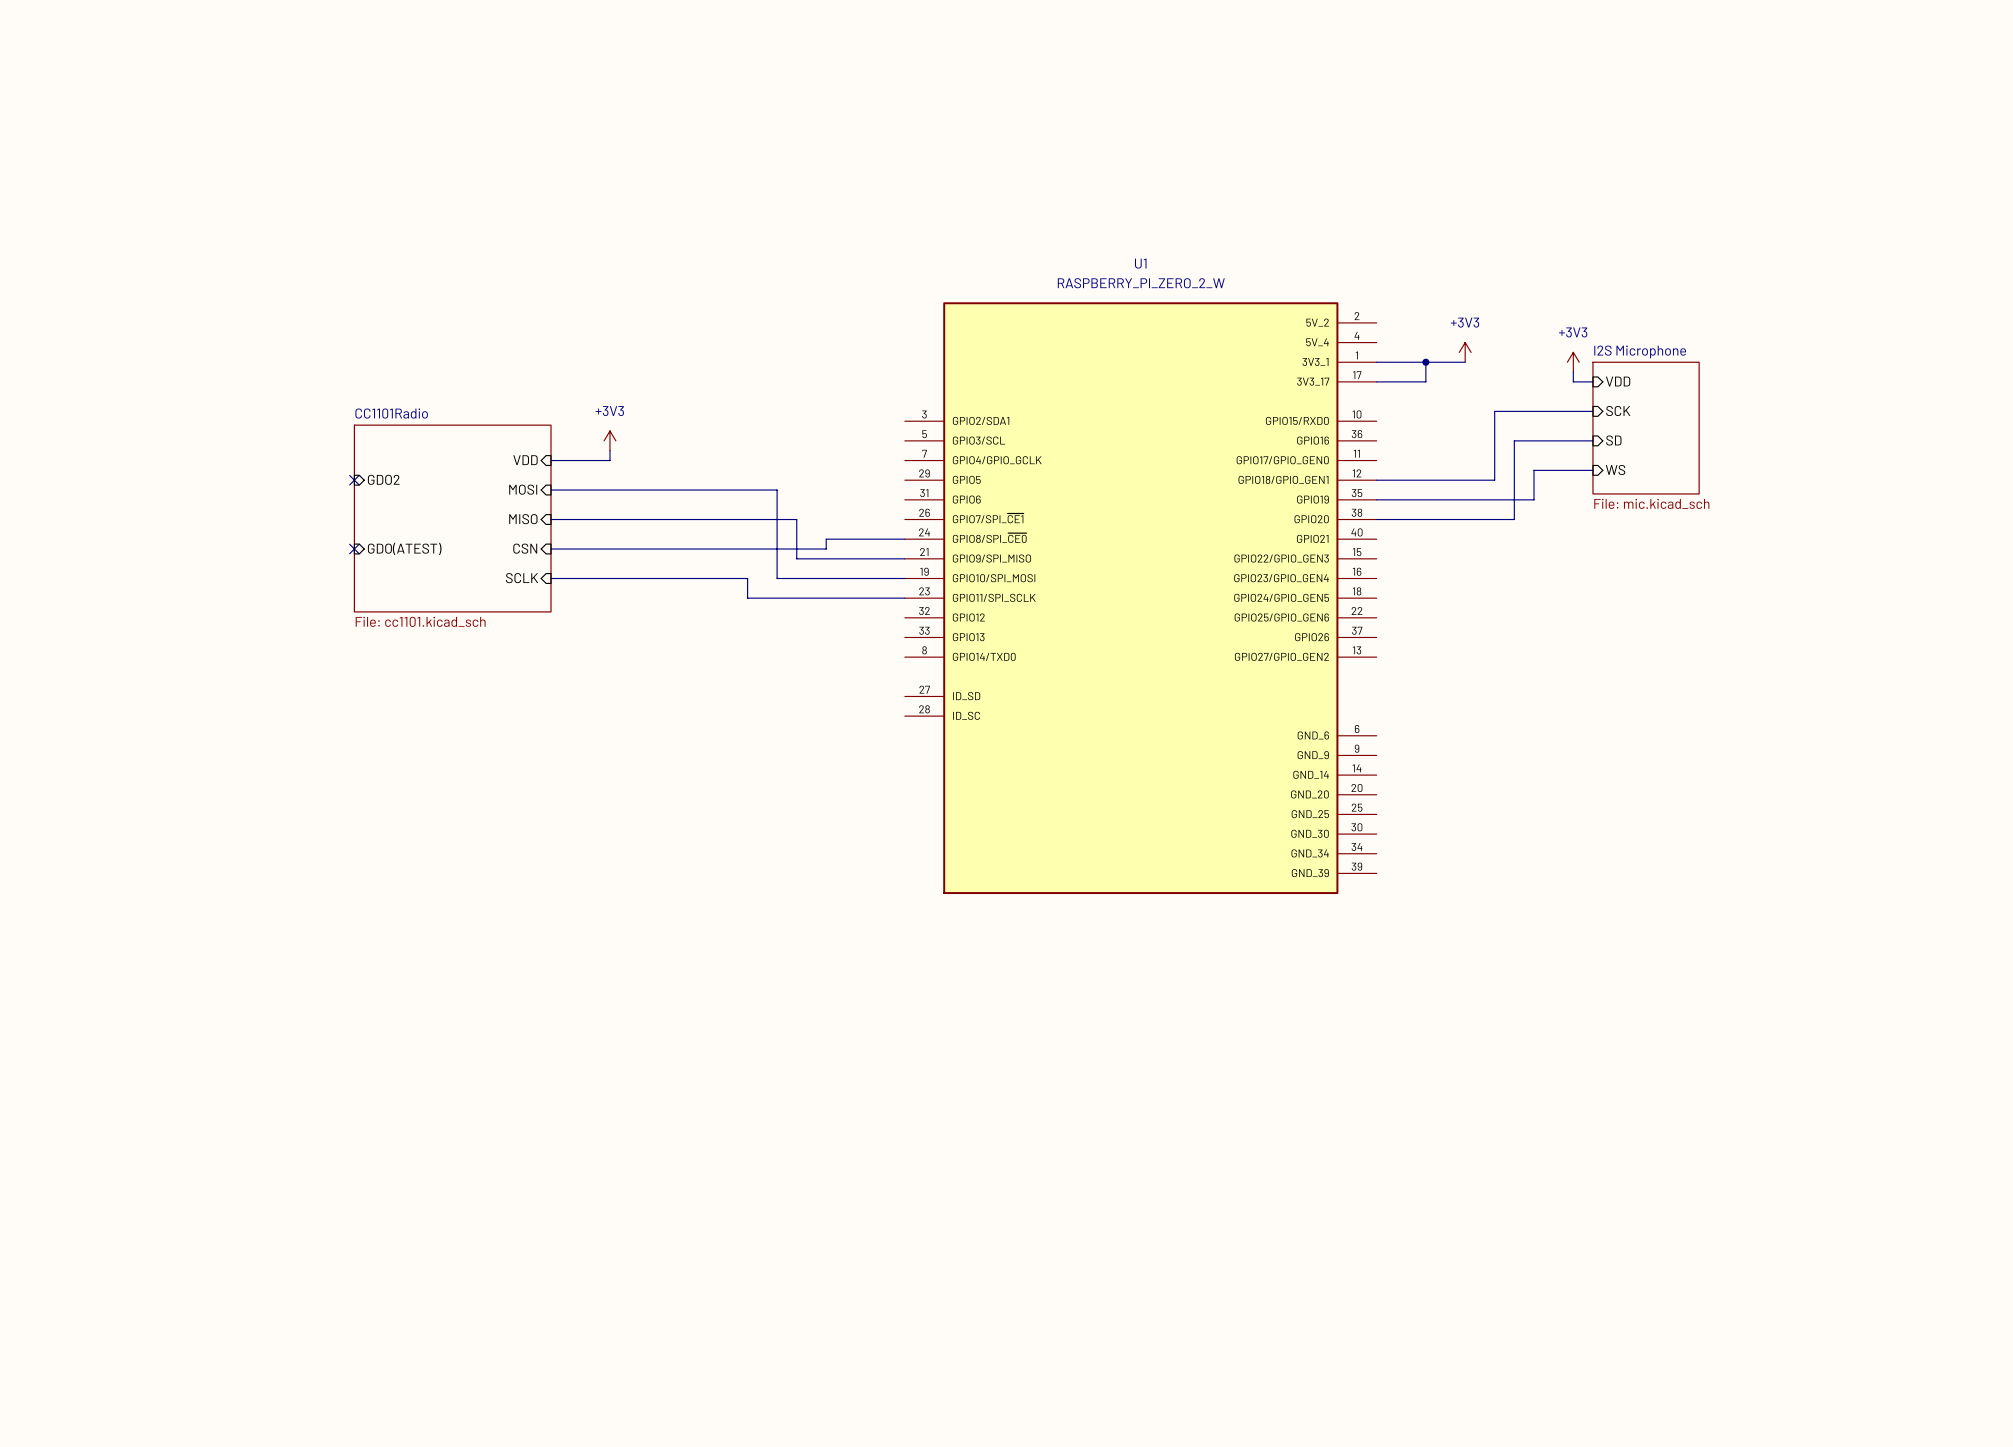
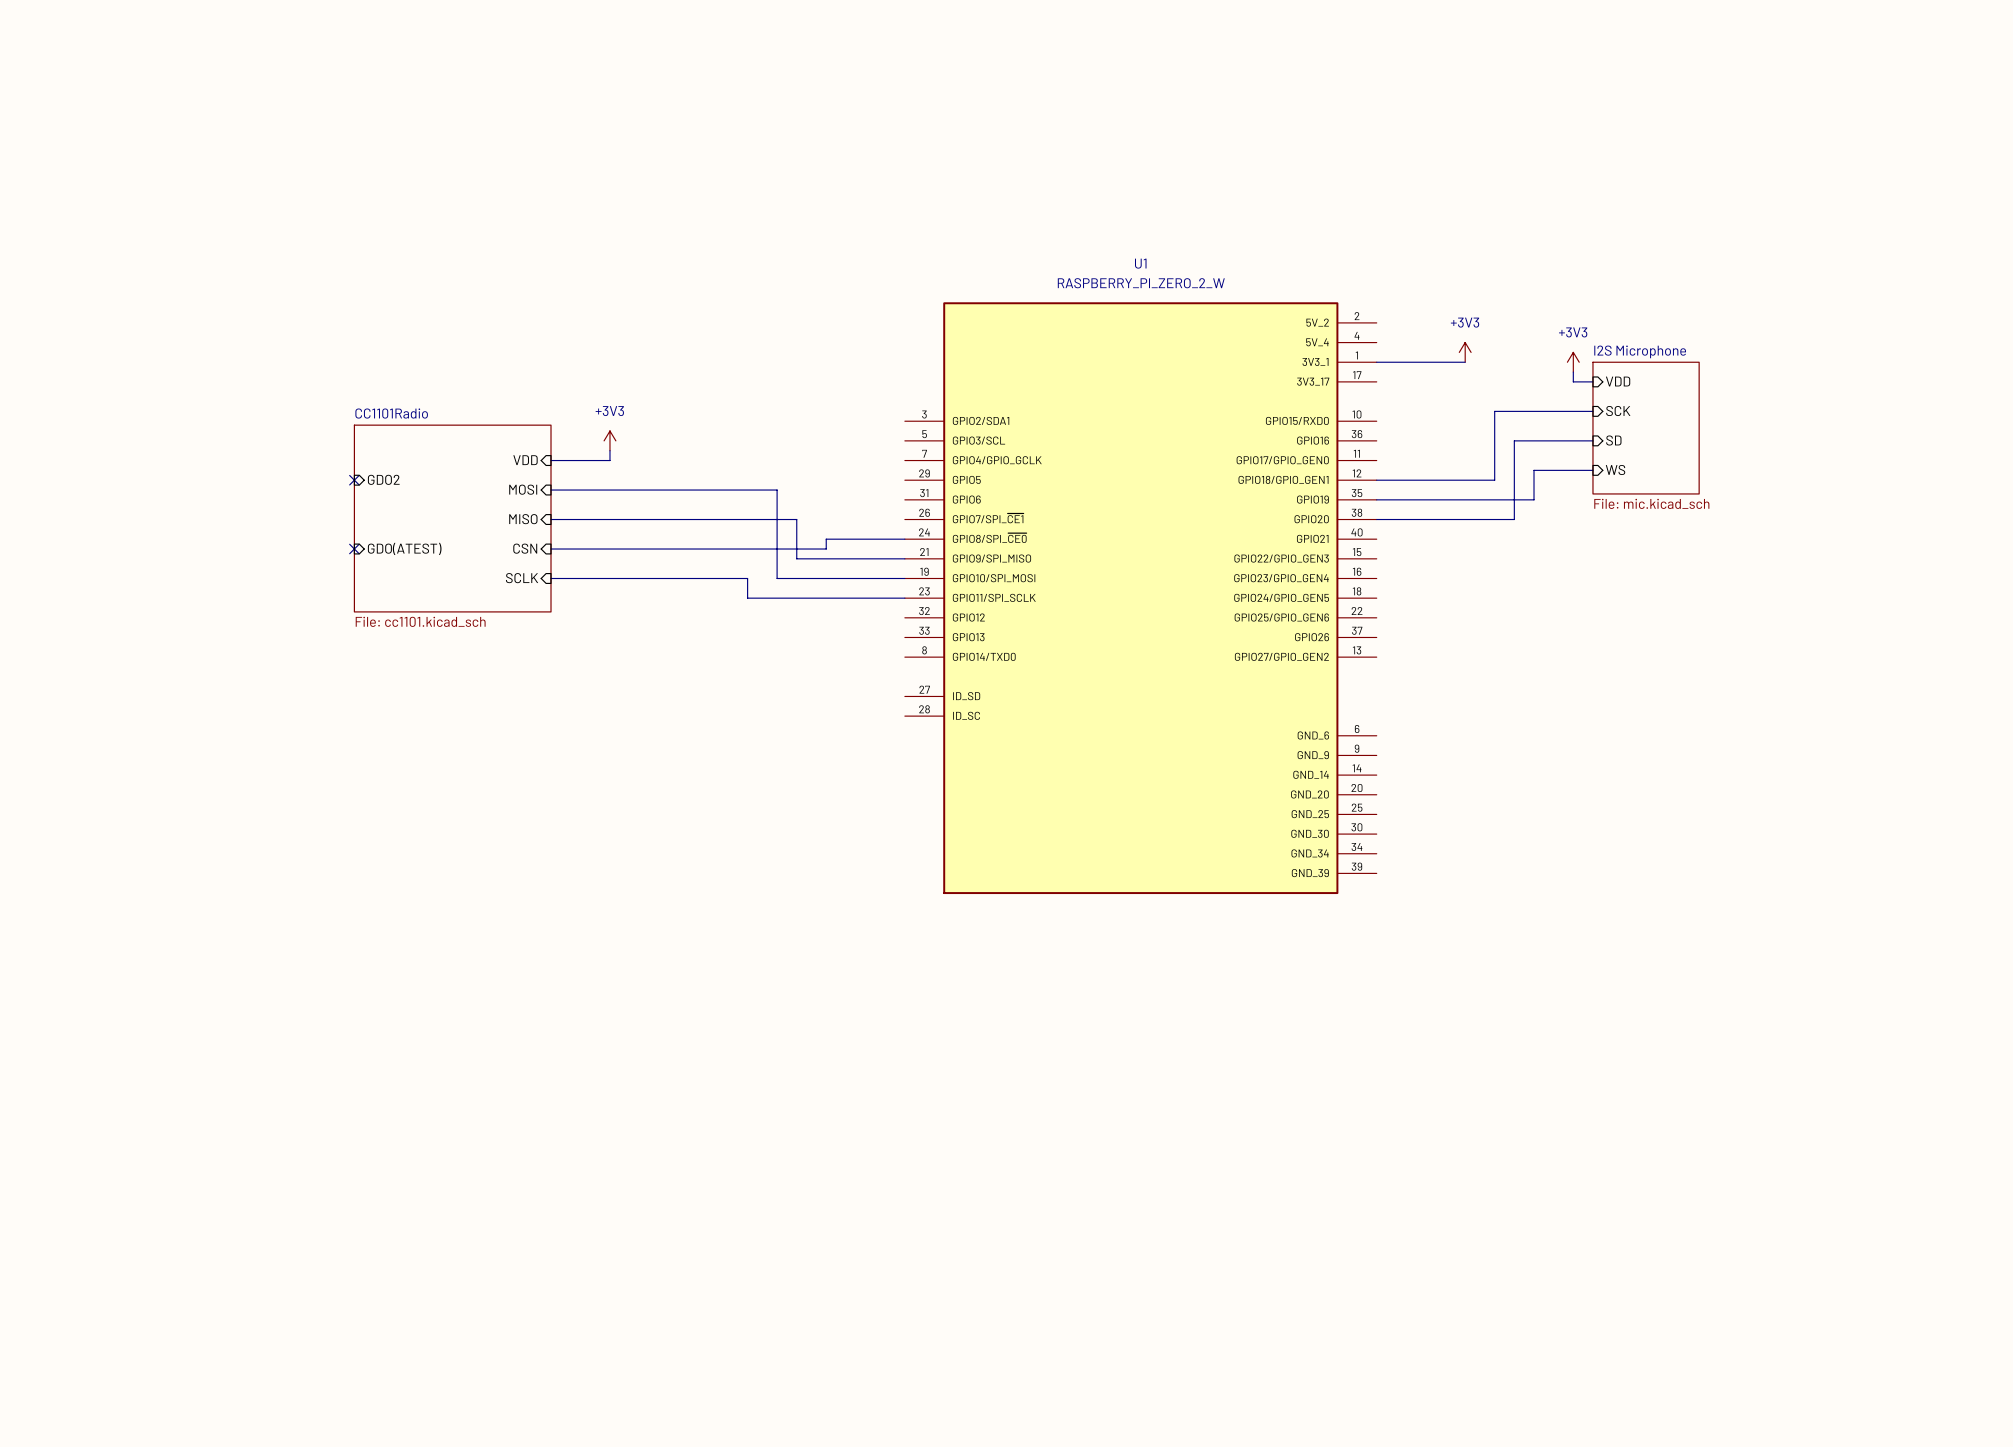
wire: (1425, 362) (1425, 381) (1376, 381) -> none
junction: (1425, 362) -> none

